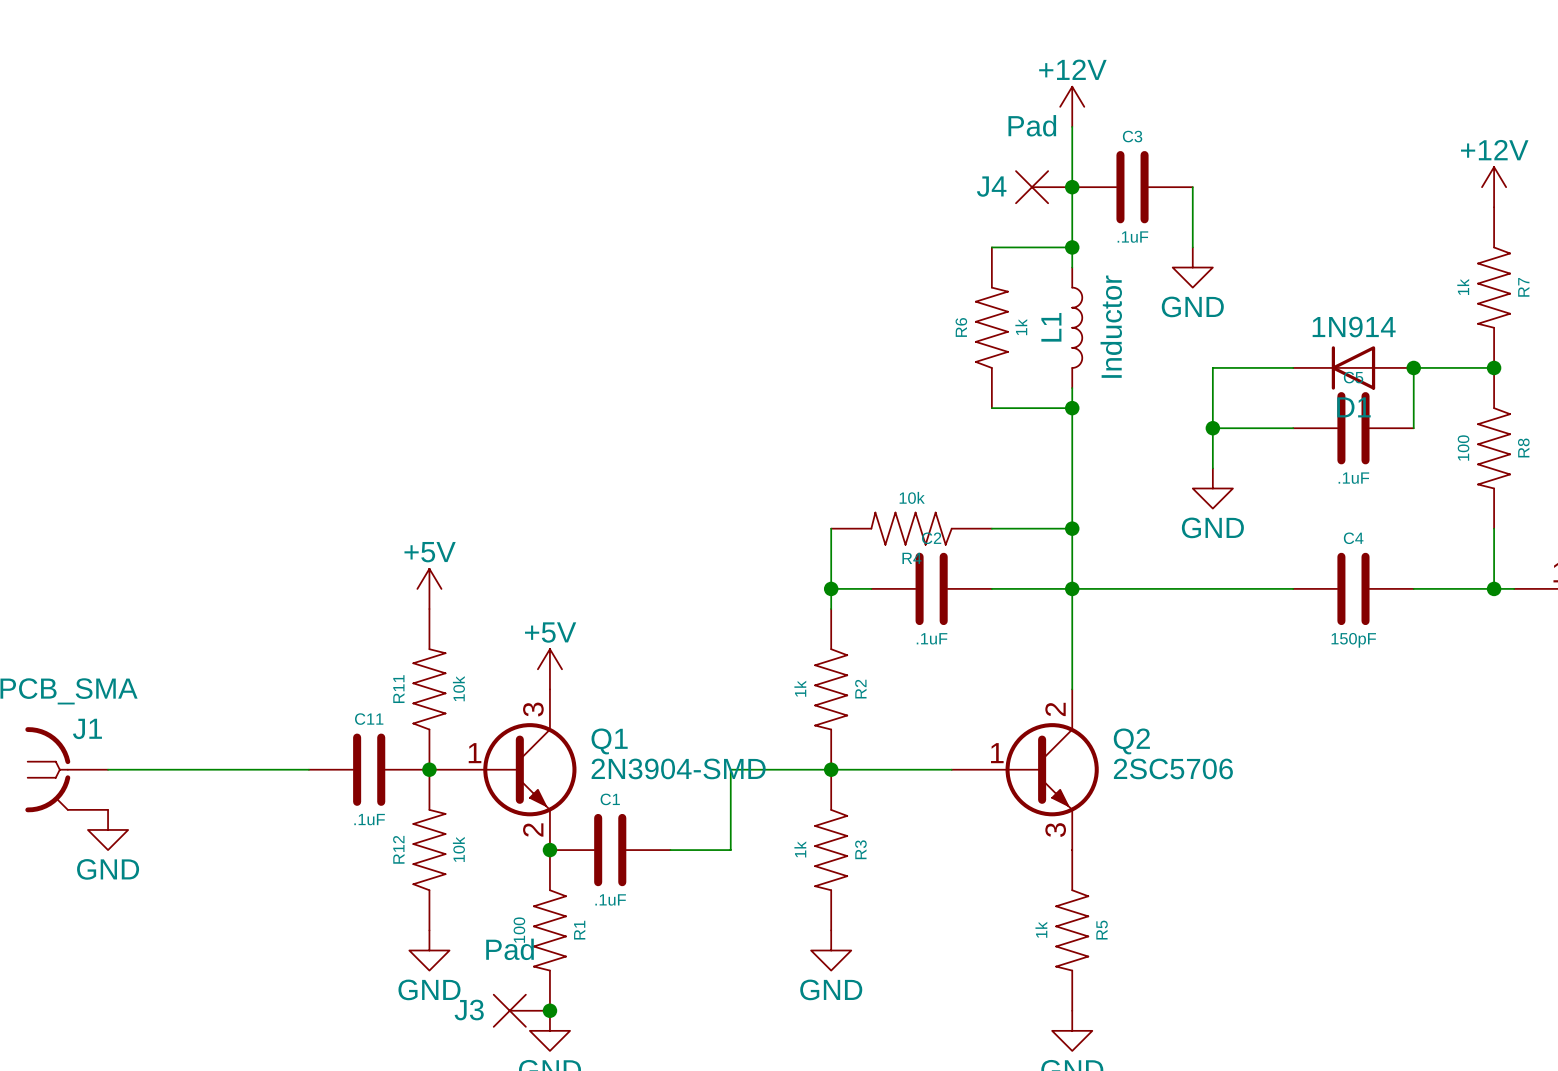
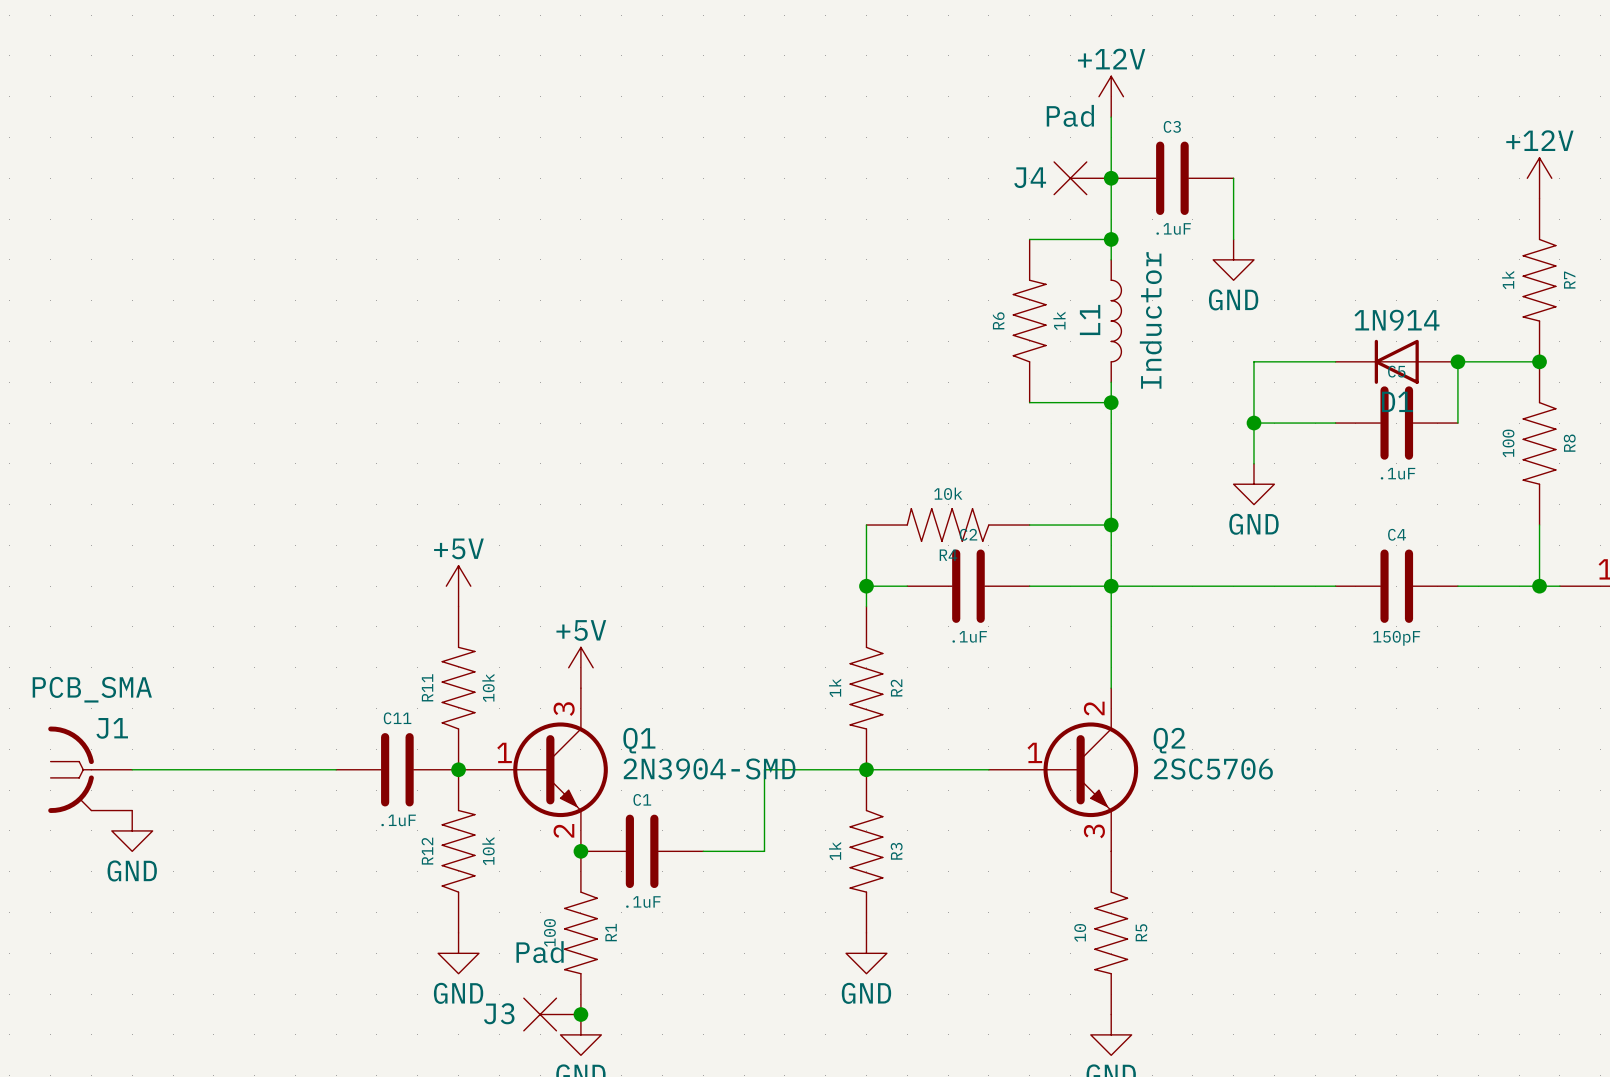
R5 value: 1k (1041, 929) -> 10 (1080, 932)

